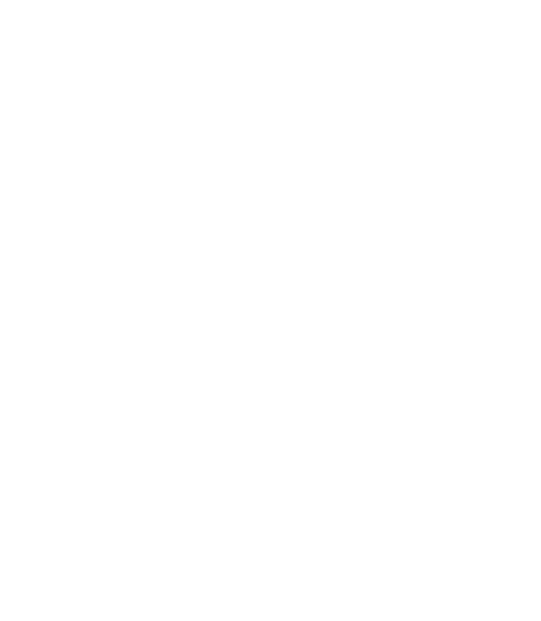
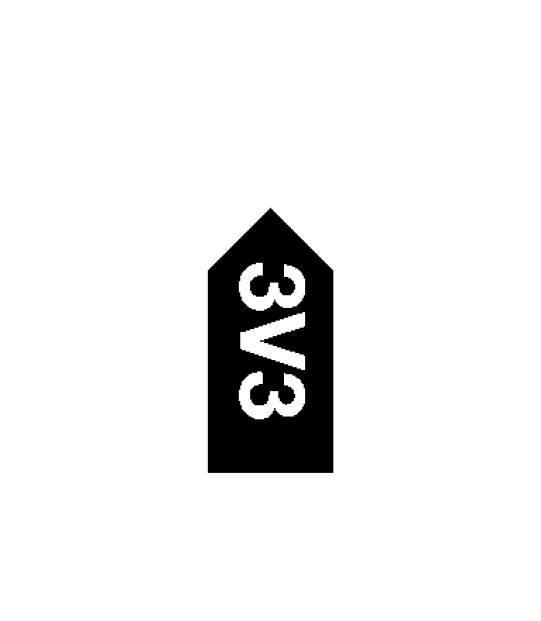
drawing: none -> [207, 207, 334, 473]

